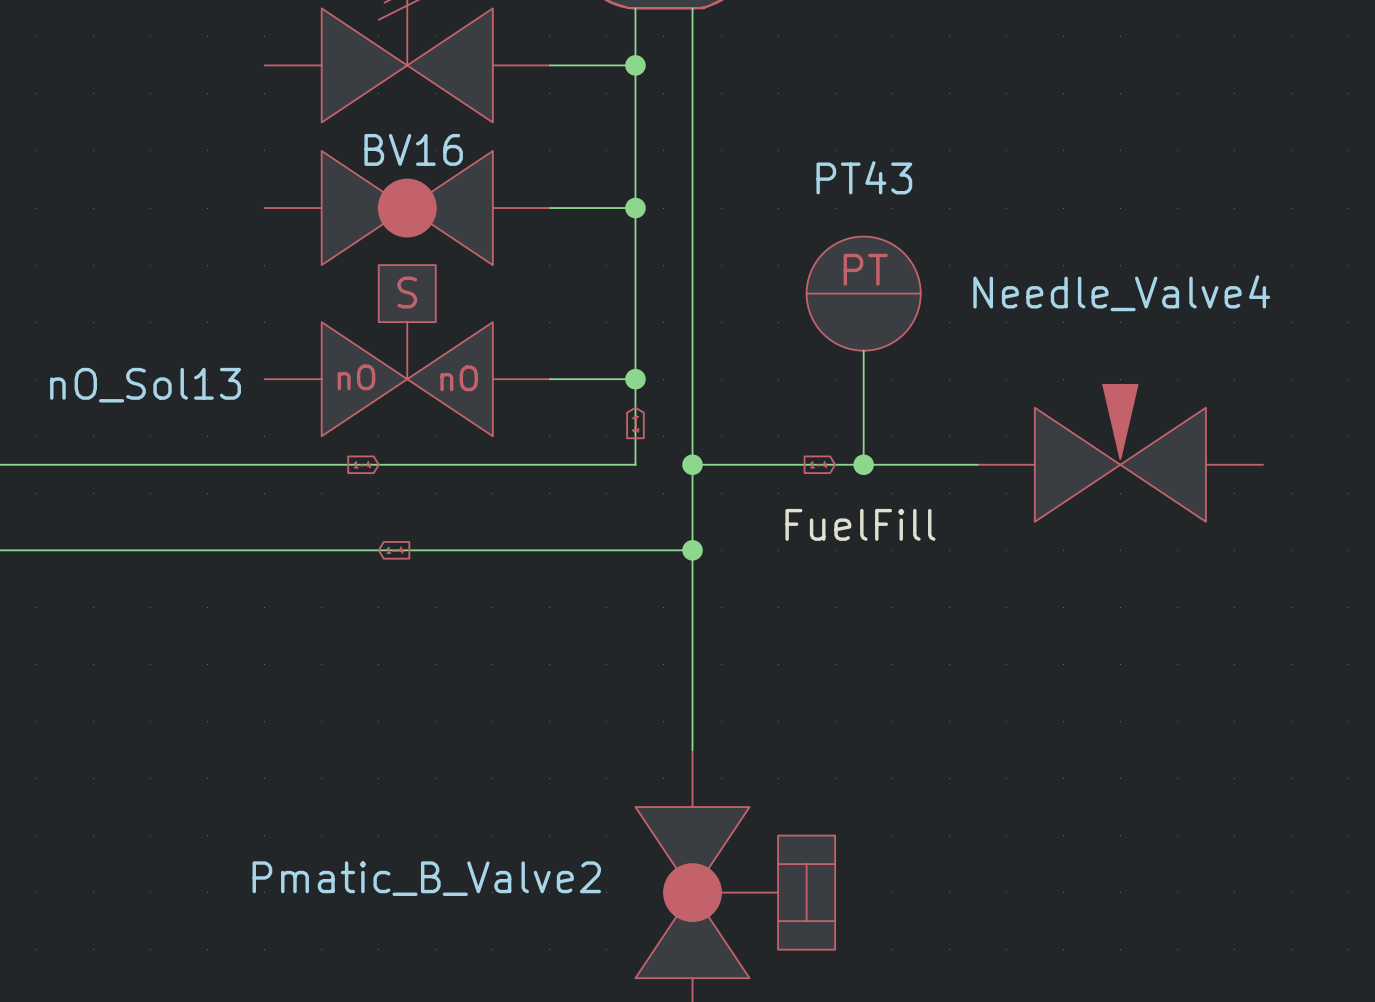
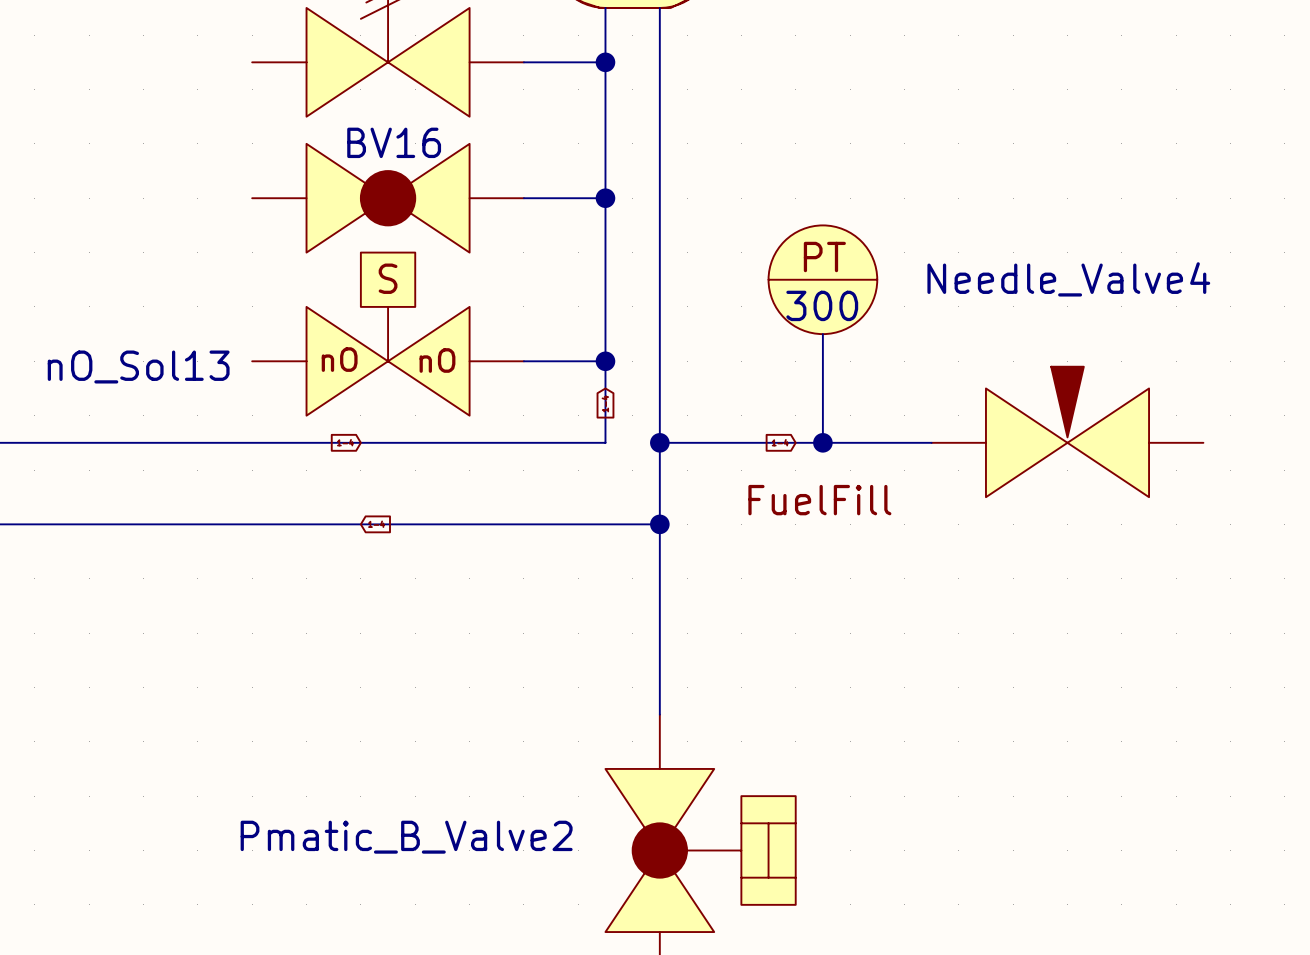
PT43 name: PT43 (864, 177) -> none
PT43 value: none -> 300 (822, 305)

